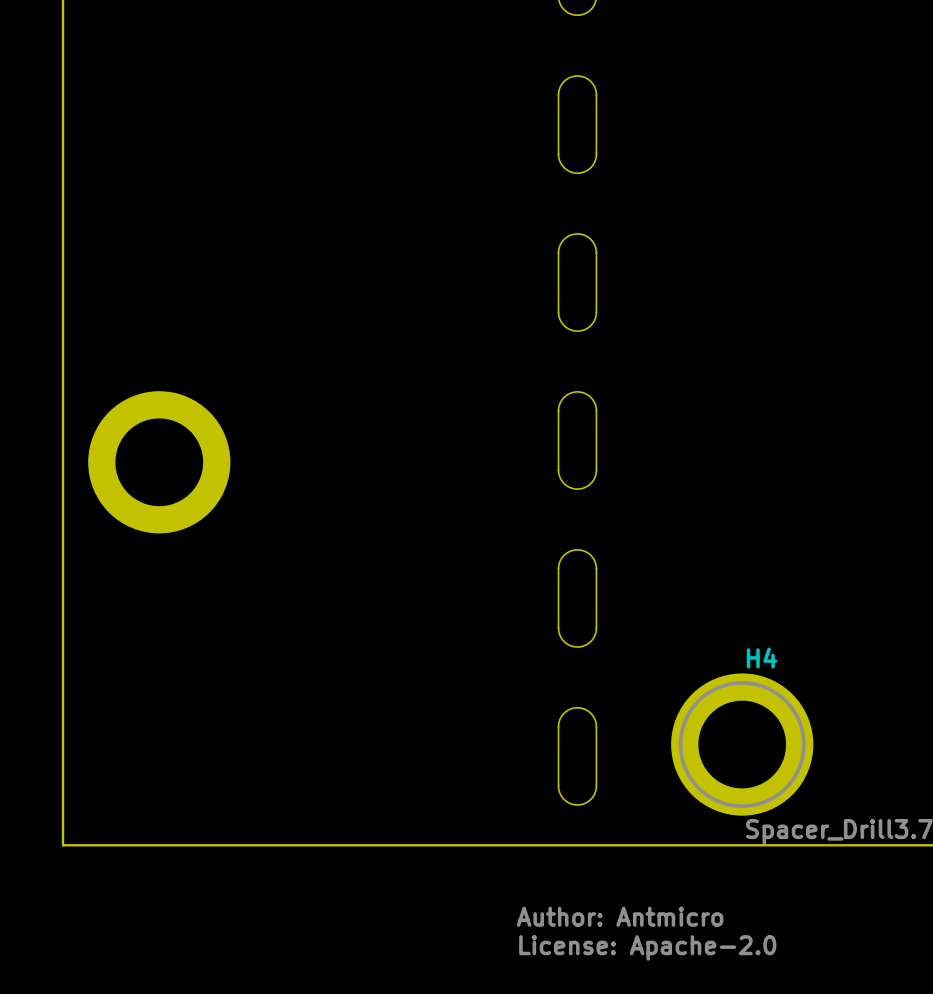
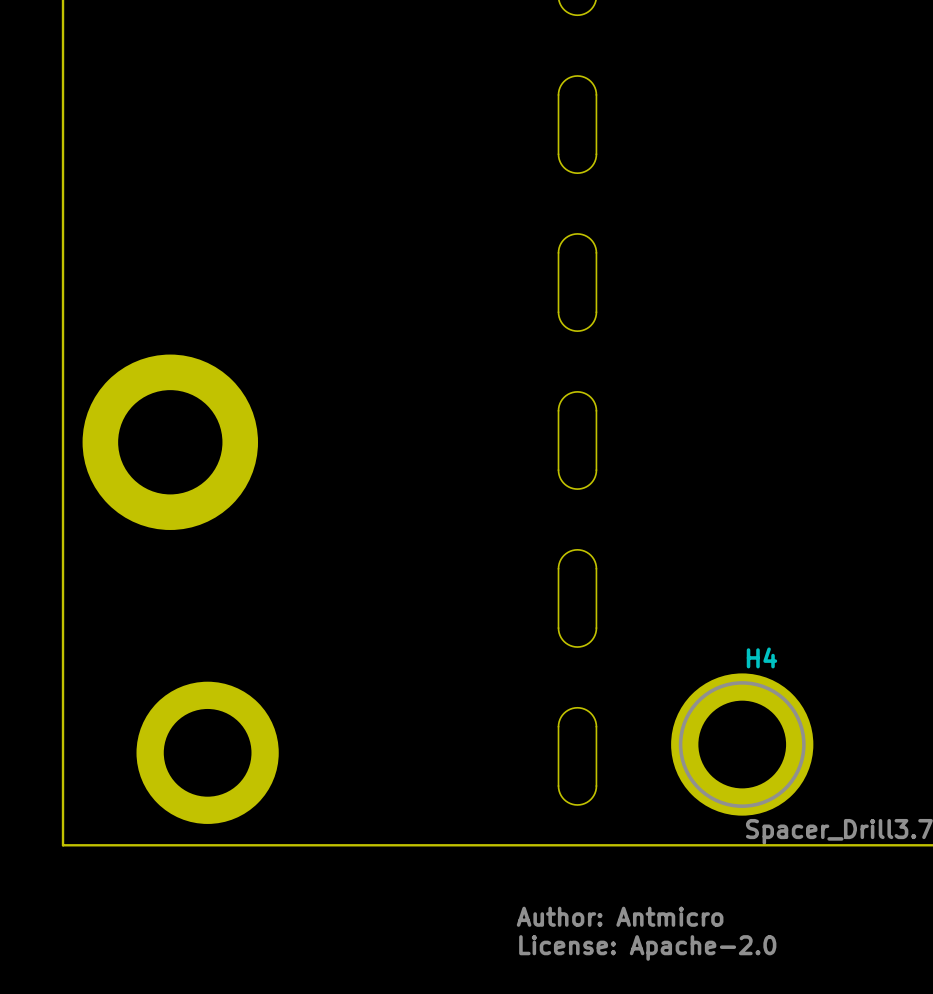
part footprint: [88, 391, 231, 534] -> [82, 354, 259, 530]
part: none -> (207, 752)

